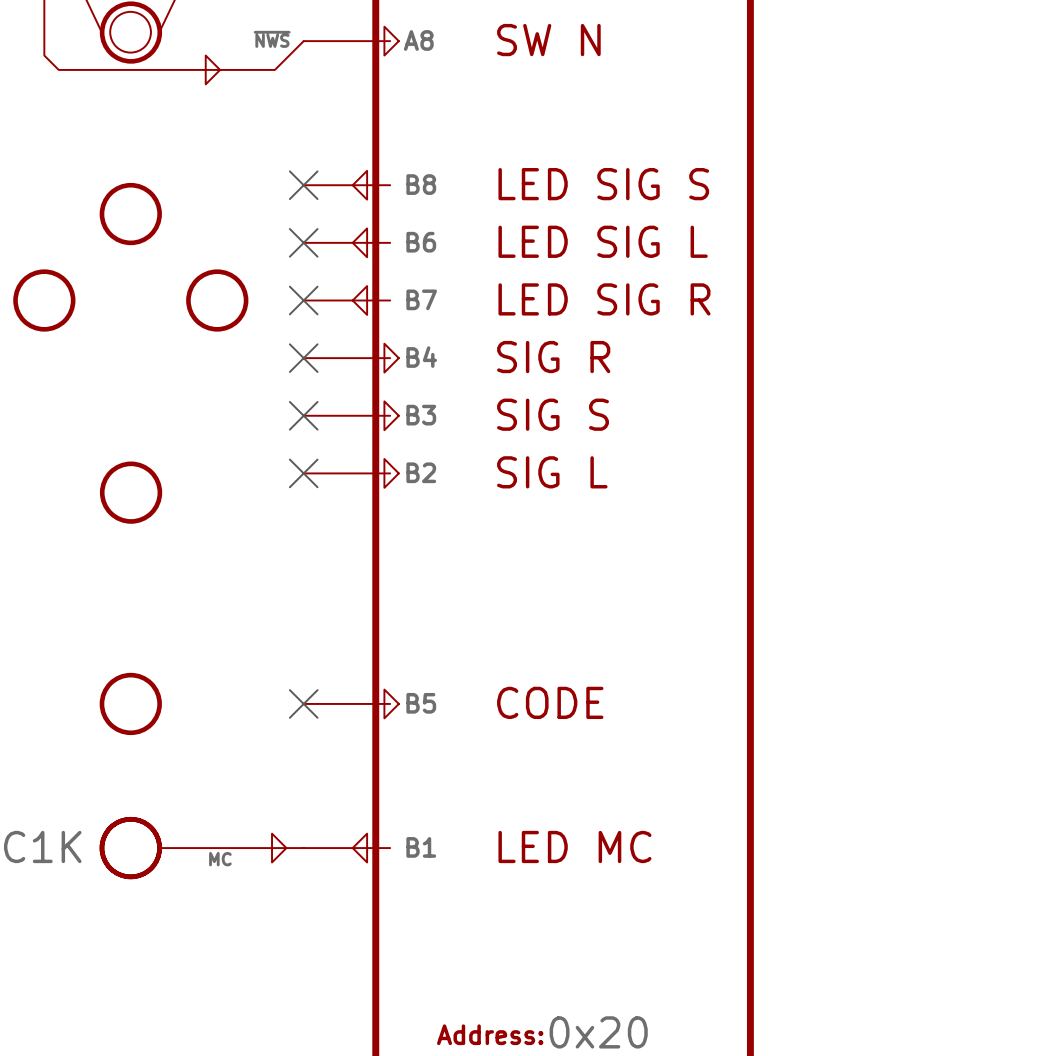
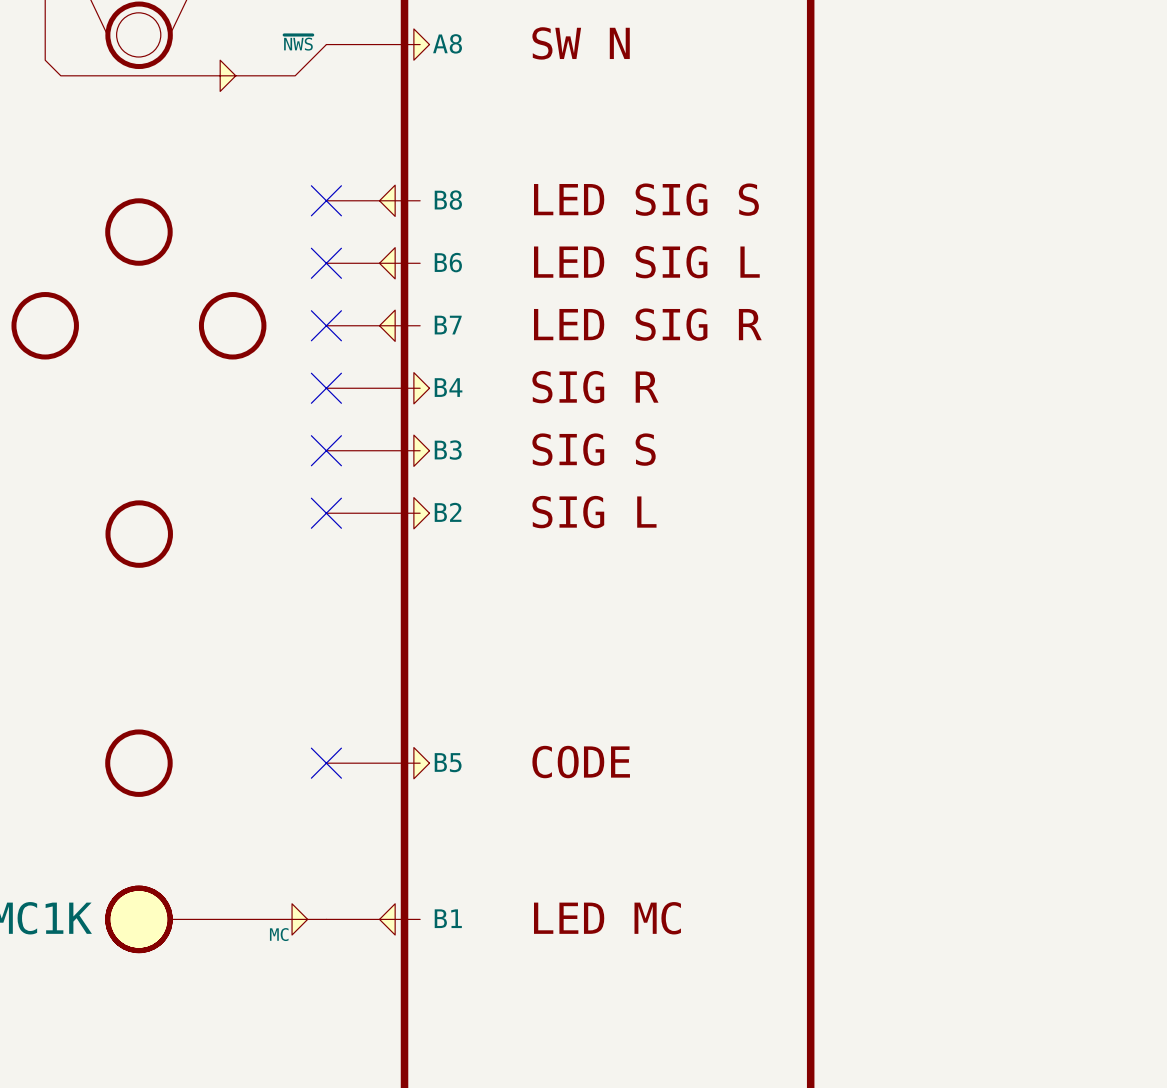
part value position: MC (220, 859) -> MC (279, 934)

